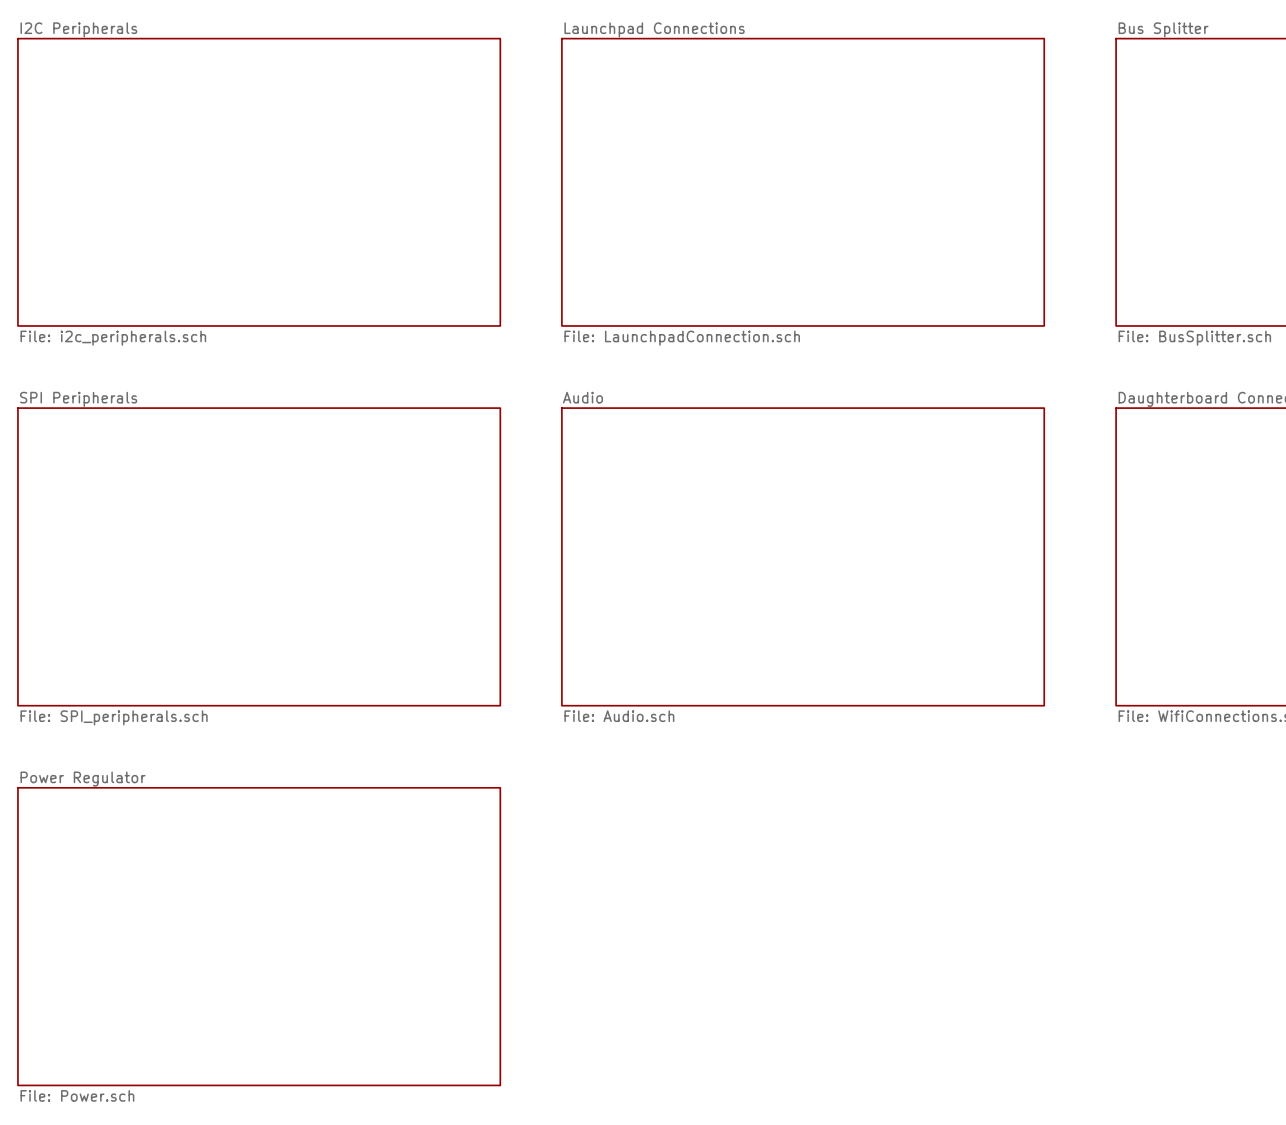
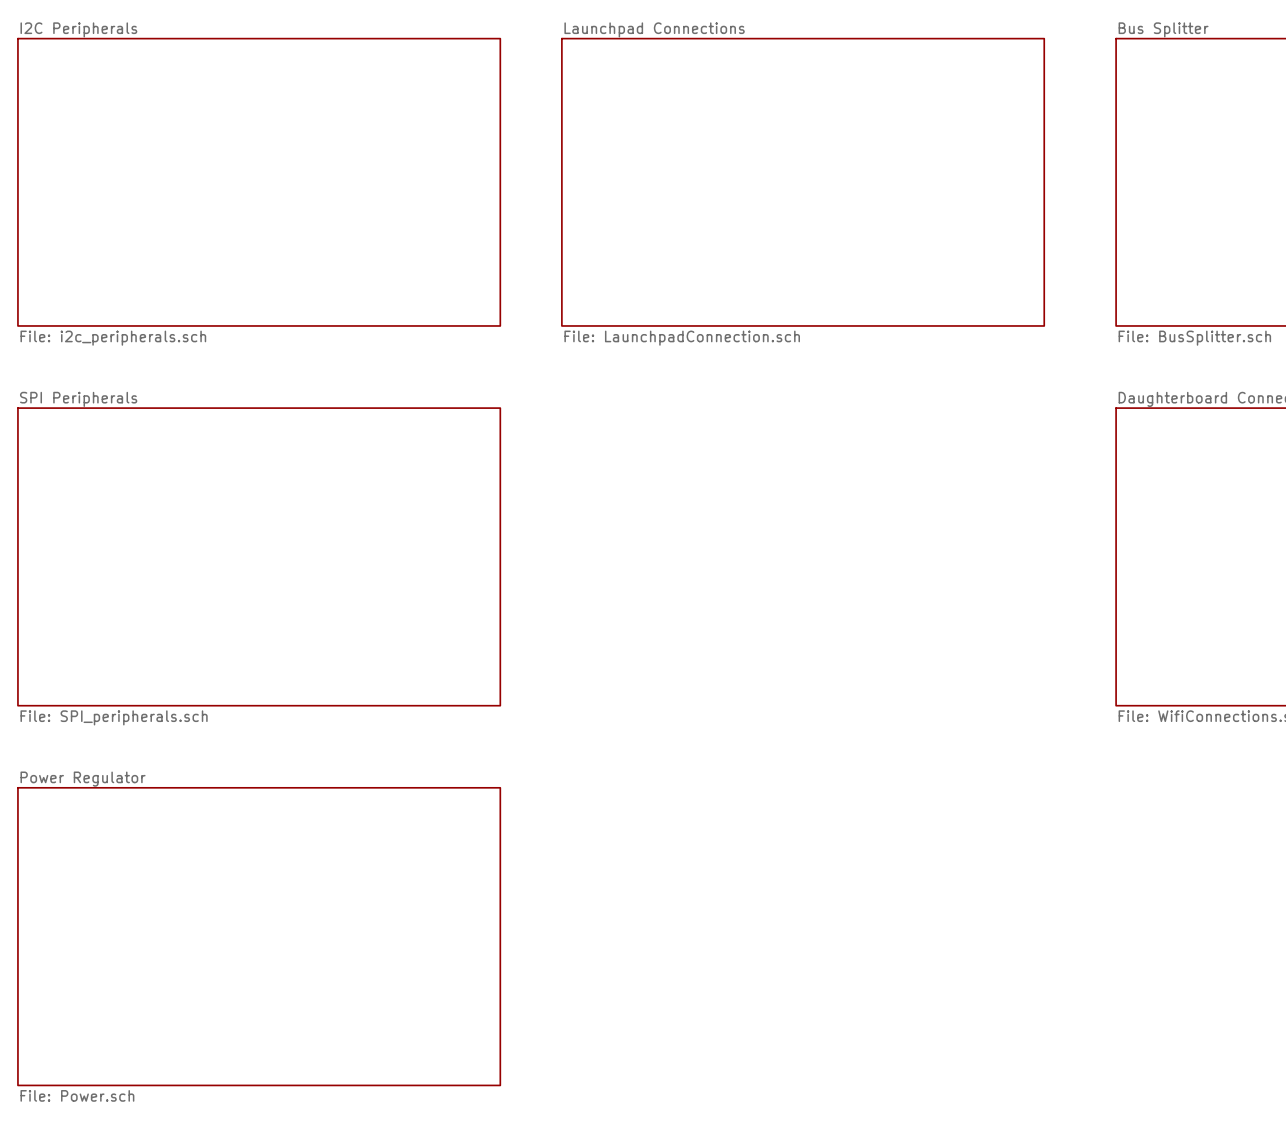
sheet Audio: File: Audio.sch (803, 556) -> none

